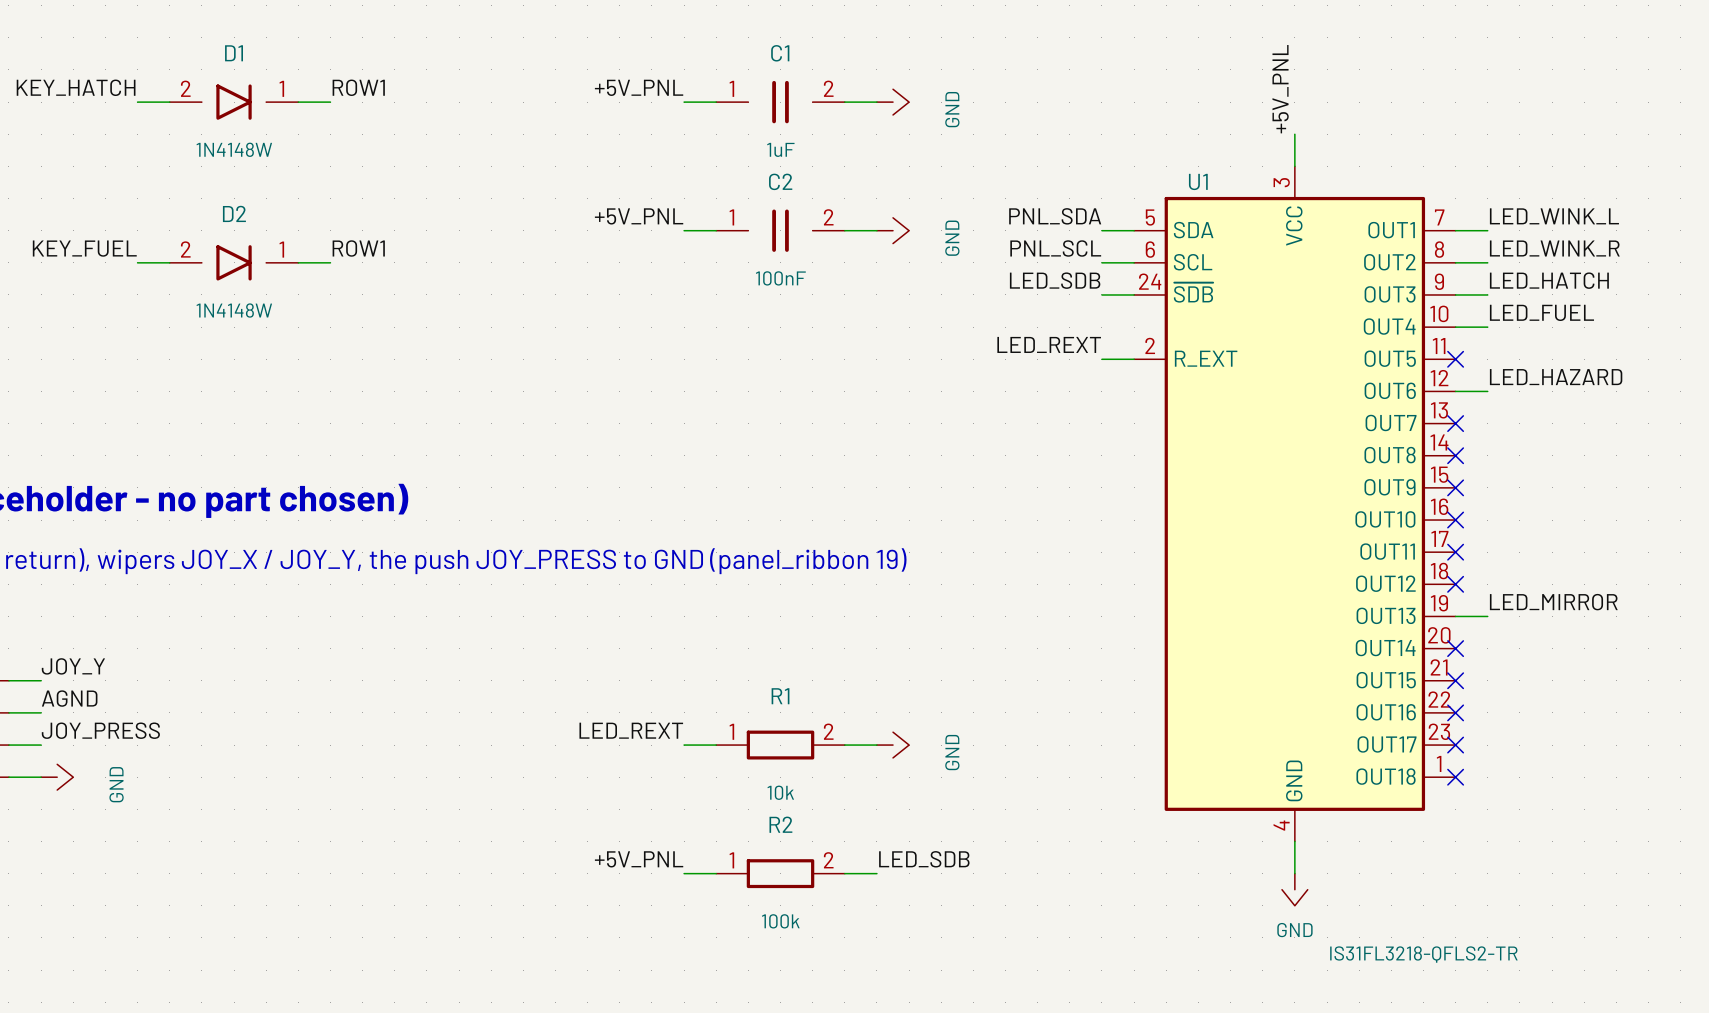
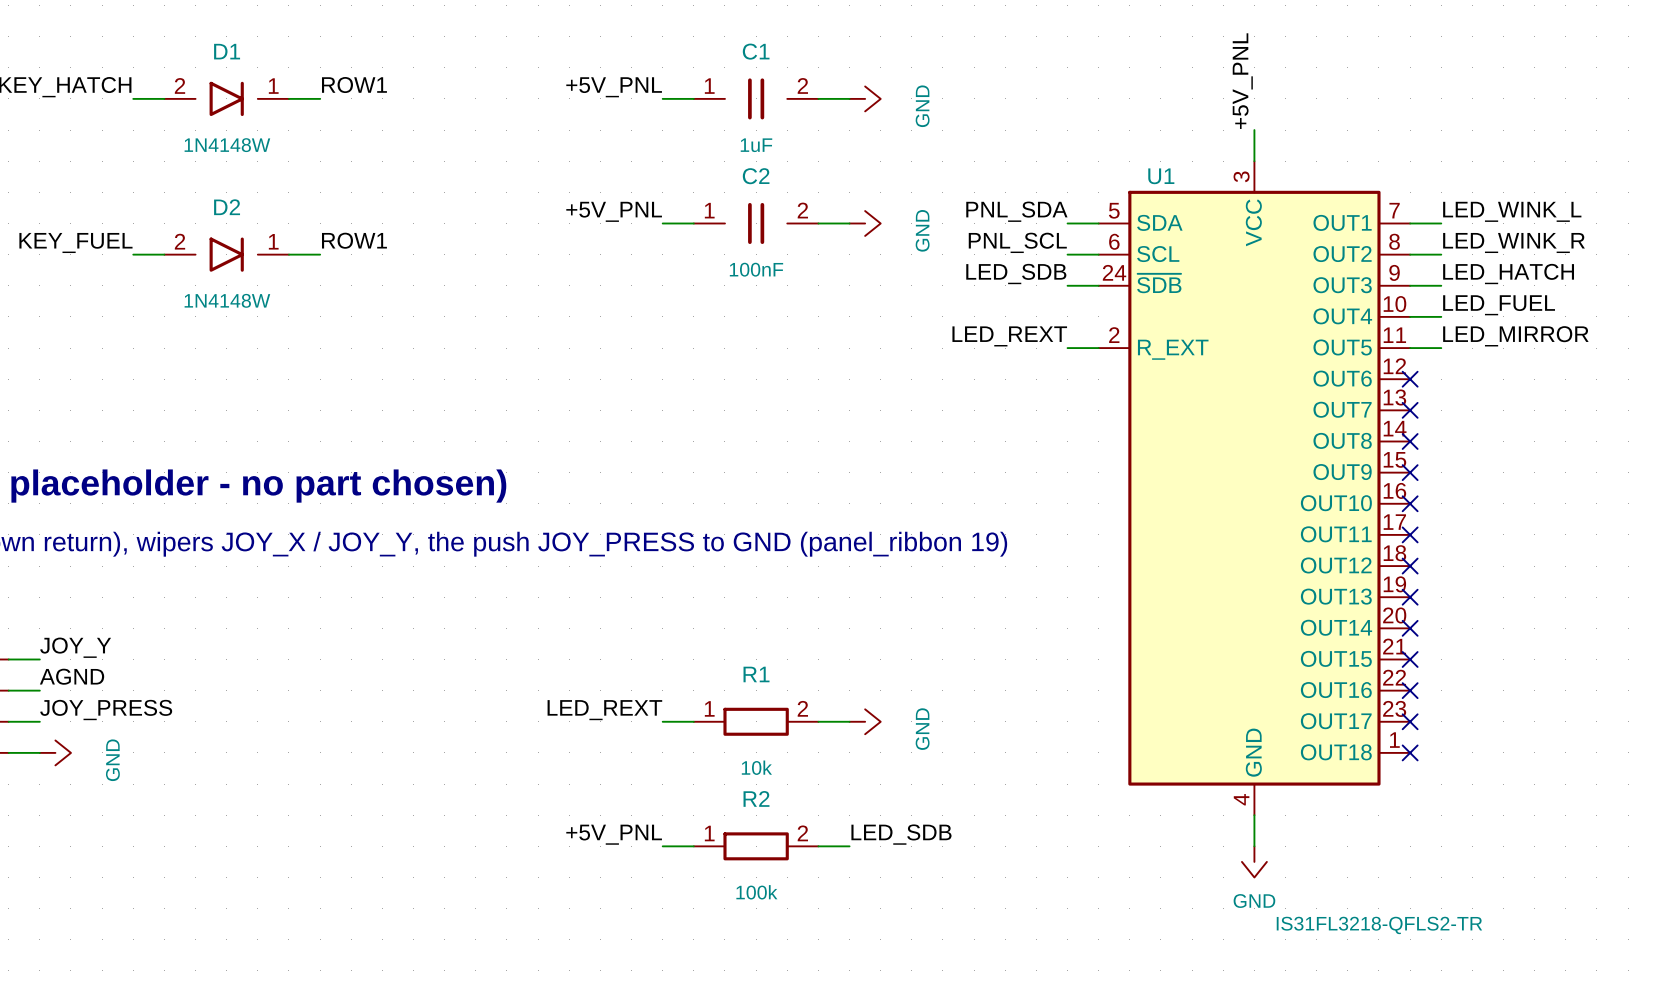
no-connect mark position: (1455, 359) -> (1410, 379)
label: LED_HAZARD (1556, 377) -> none
wire: (1455, 391) (1487, 391) -> (1410, 348) (1441, 348)
label position: LED_MIRROR (1553, 602) -> LED_MIRROR (1515, 336)
wire: (1455, 616) (1487, 616) -> none
no-connect mark: none -> (1410, 597)

